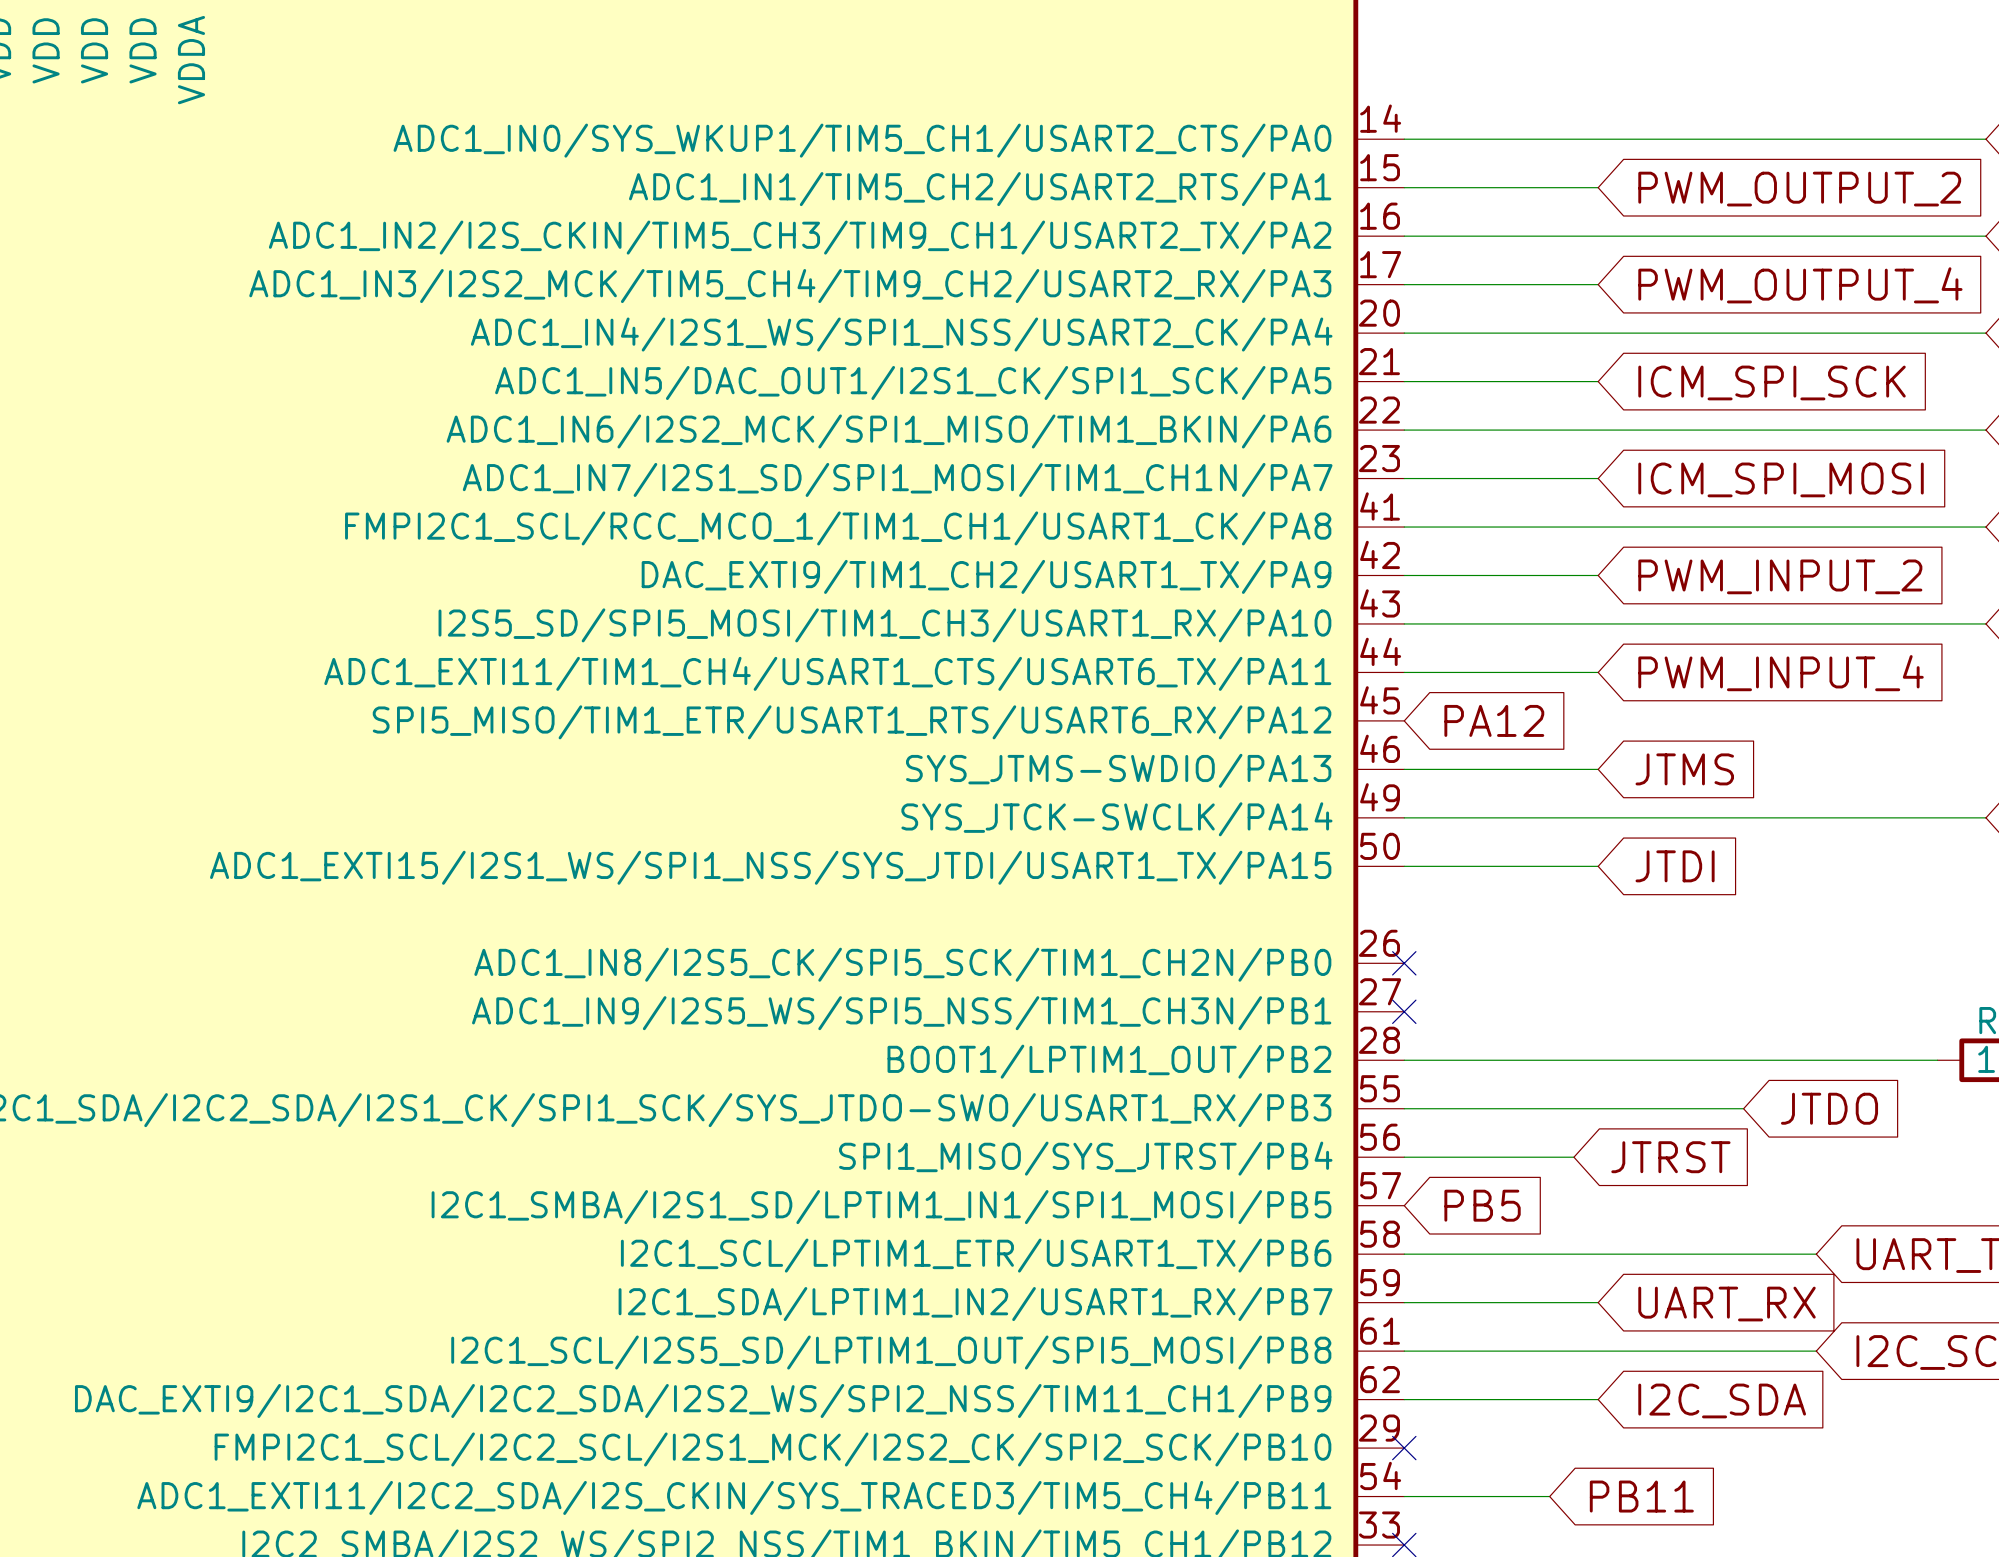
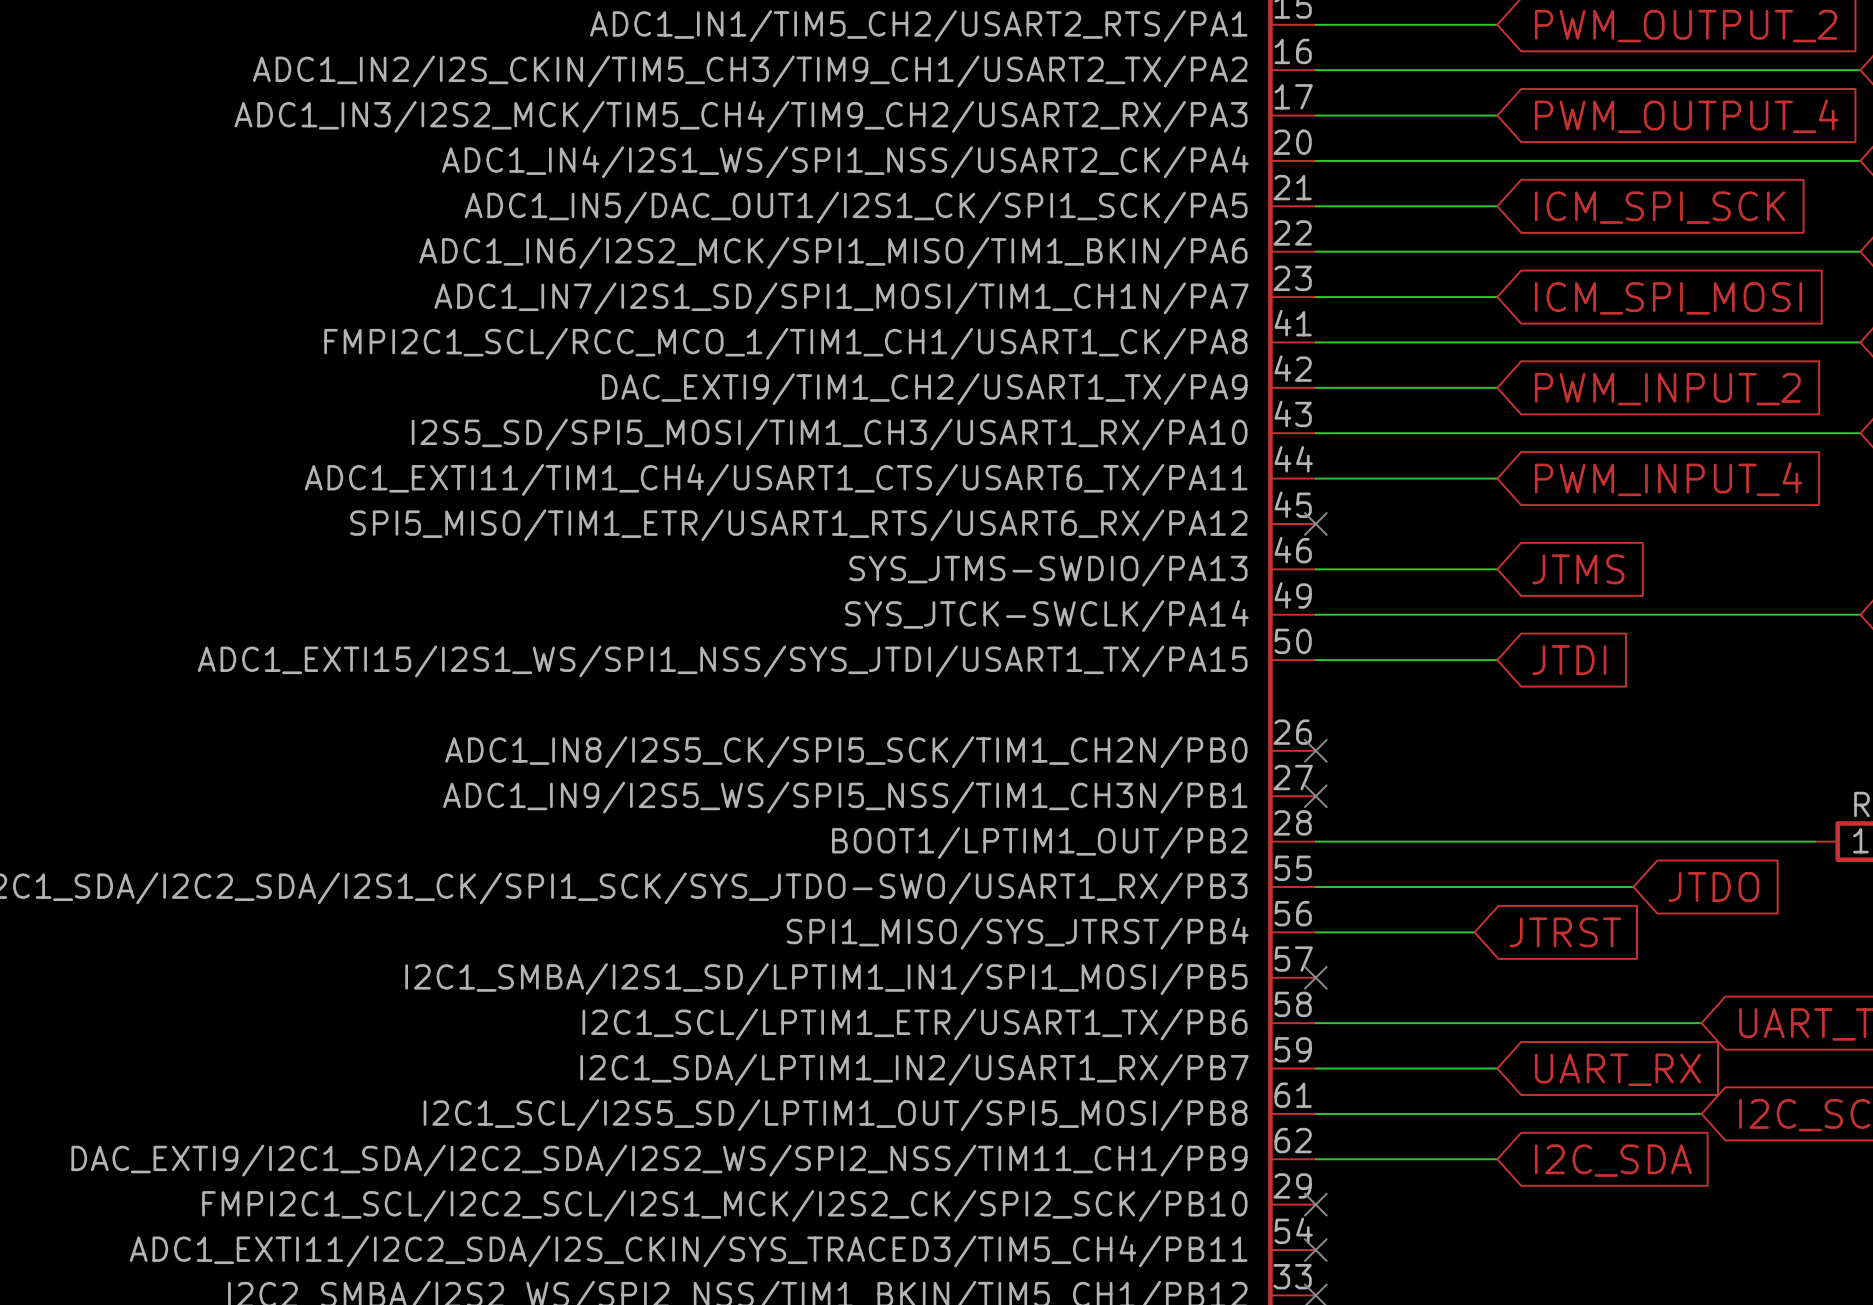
no-connect mark: none -> (1315, 523)
global label: PA12 (1494, 720) -> none
no-connect mark: none -> (1315, 977)
global label: PB5 (1482, 1205) -> none
wire: (1404, 1496) (1549, 1496) -> none
no-connect mark: none -> (1315, 1250)
global label: PB11 (1641, 1496) -> none

